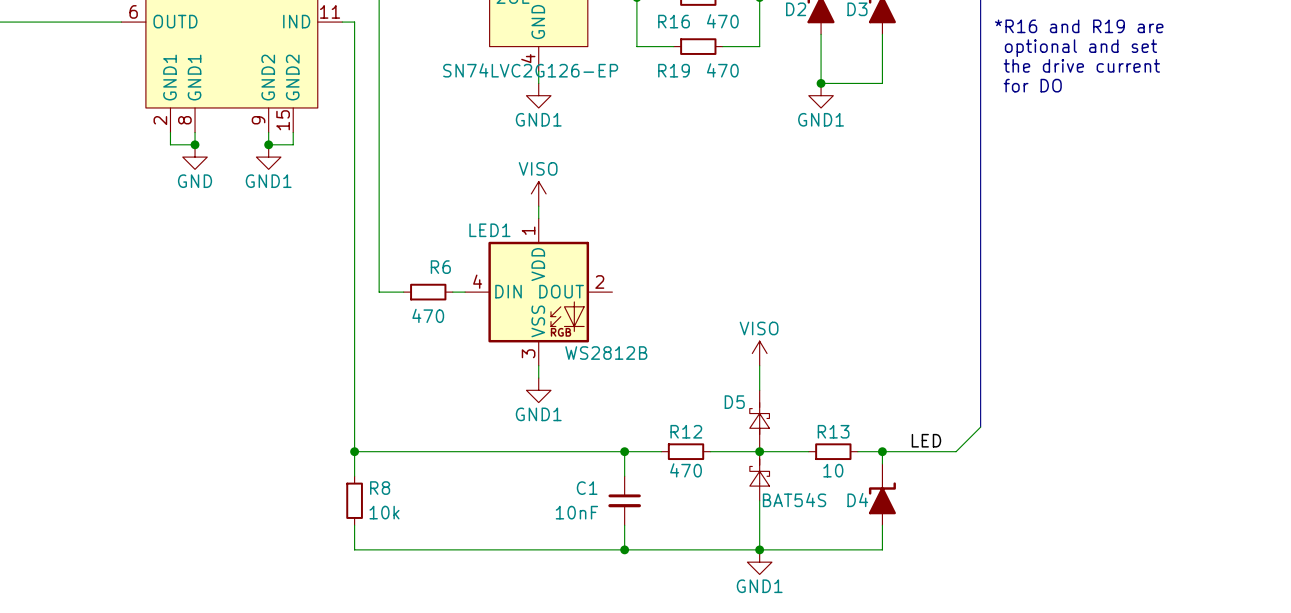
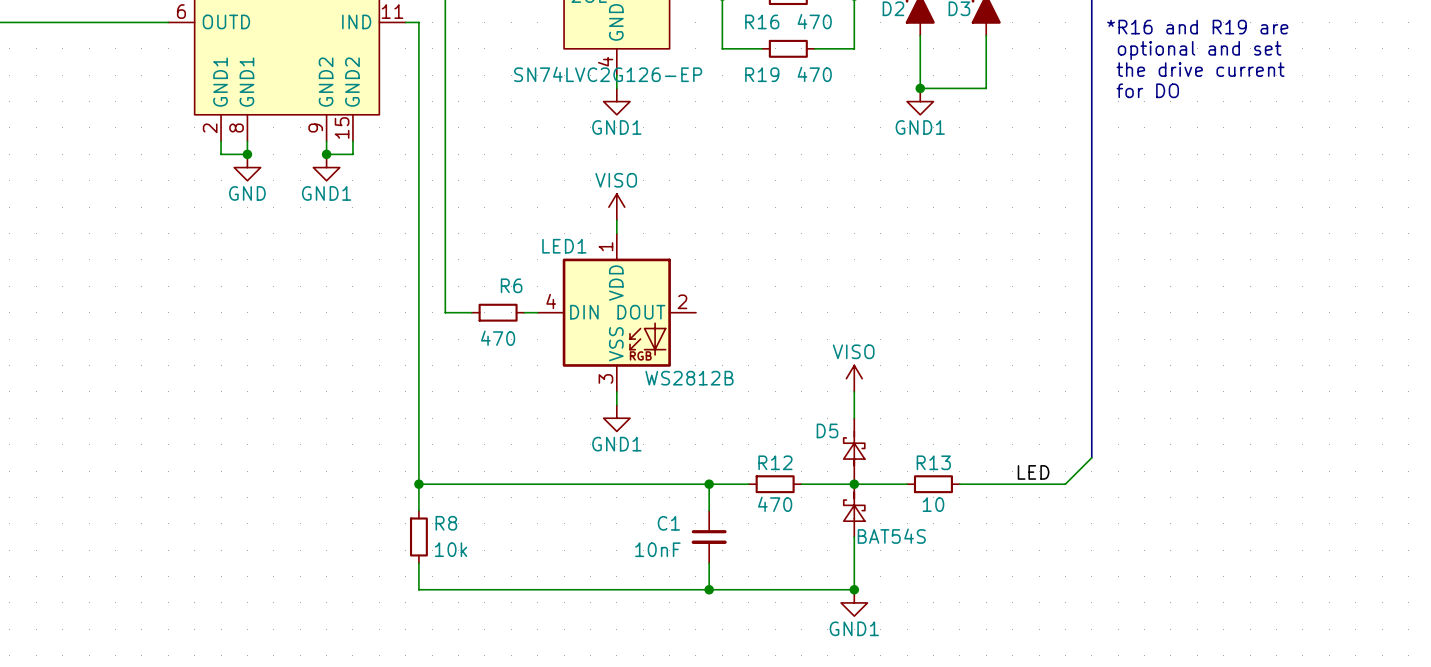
wire: (882, 451) (882, 463) -> none
junction: (882, 451) -> none
D4: (882, 494) -> none
wire: (882, 525) (882, 549) (759, 549) -> none

